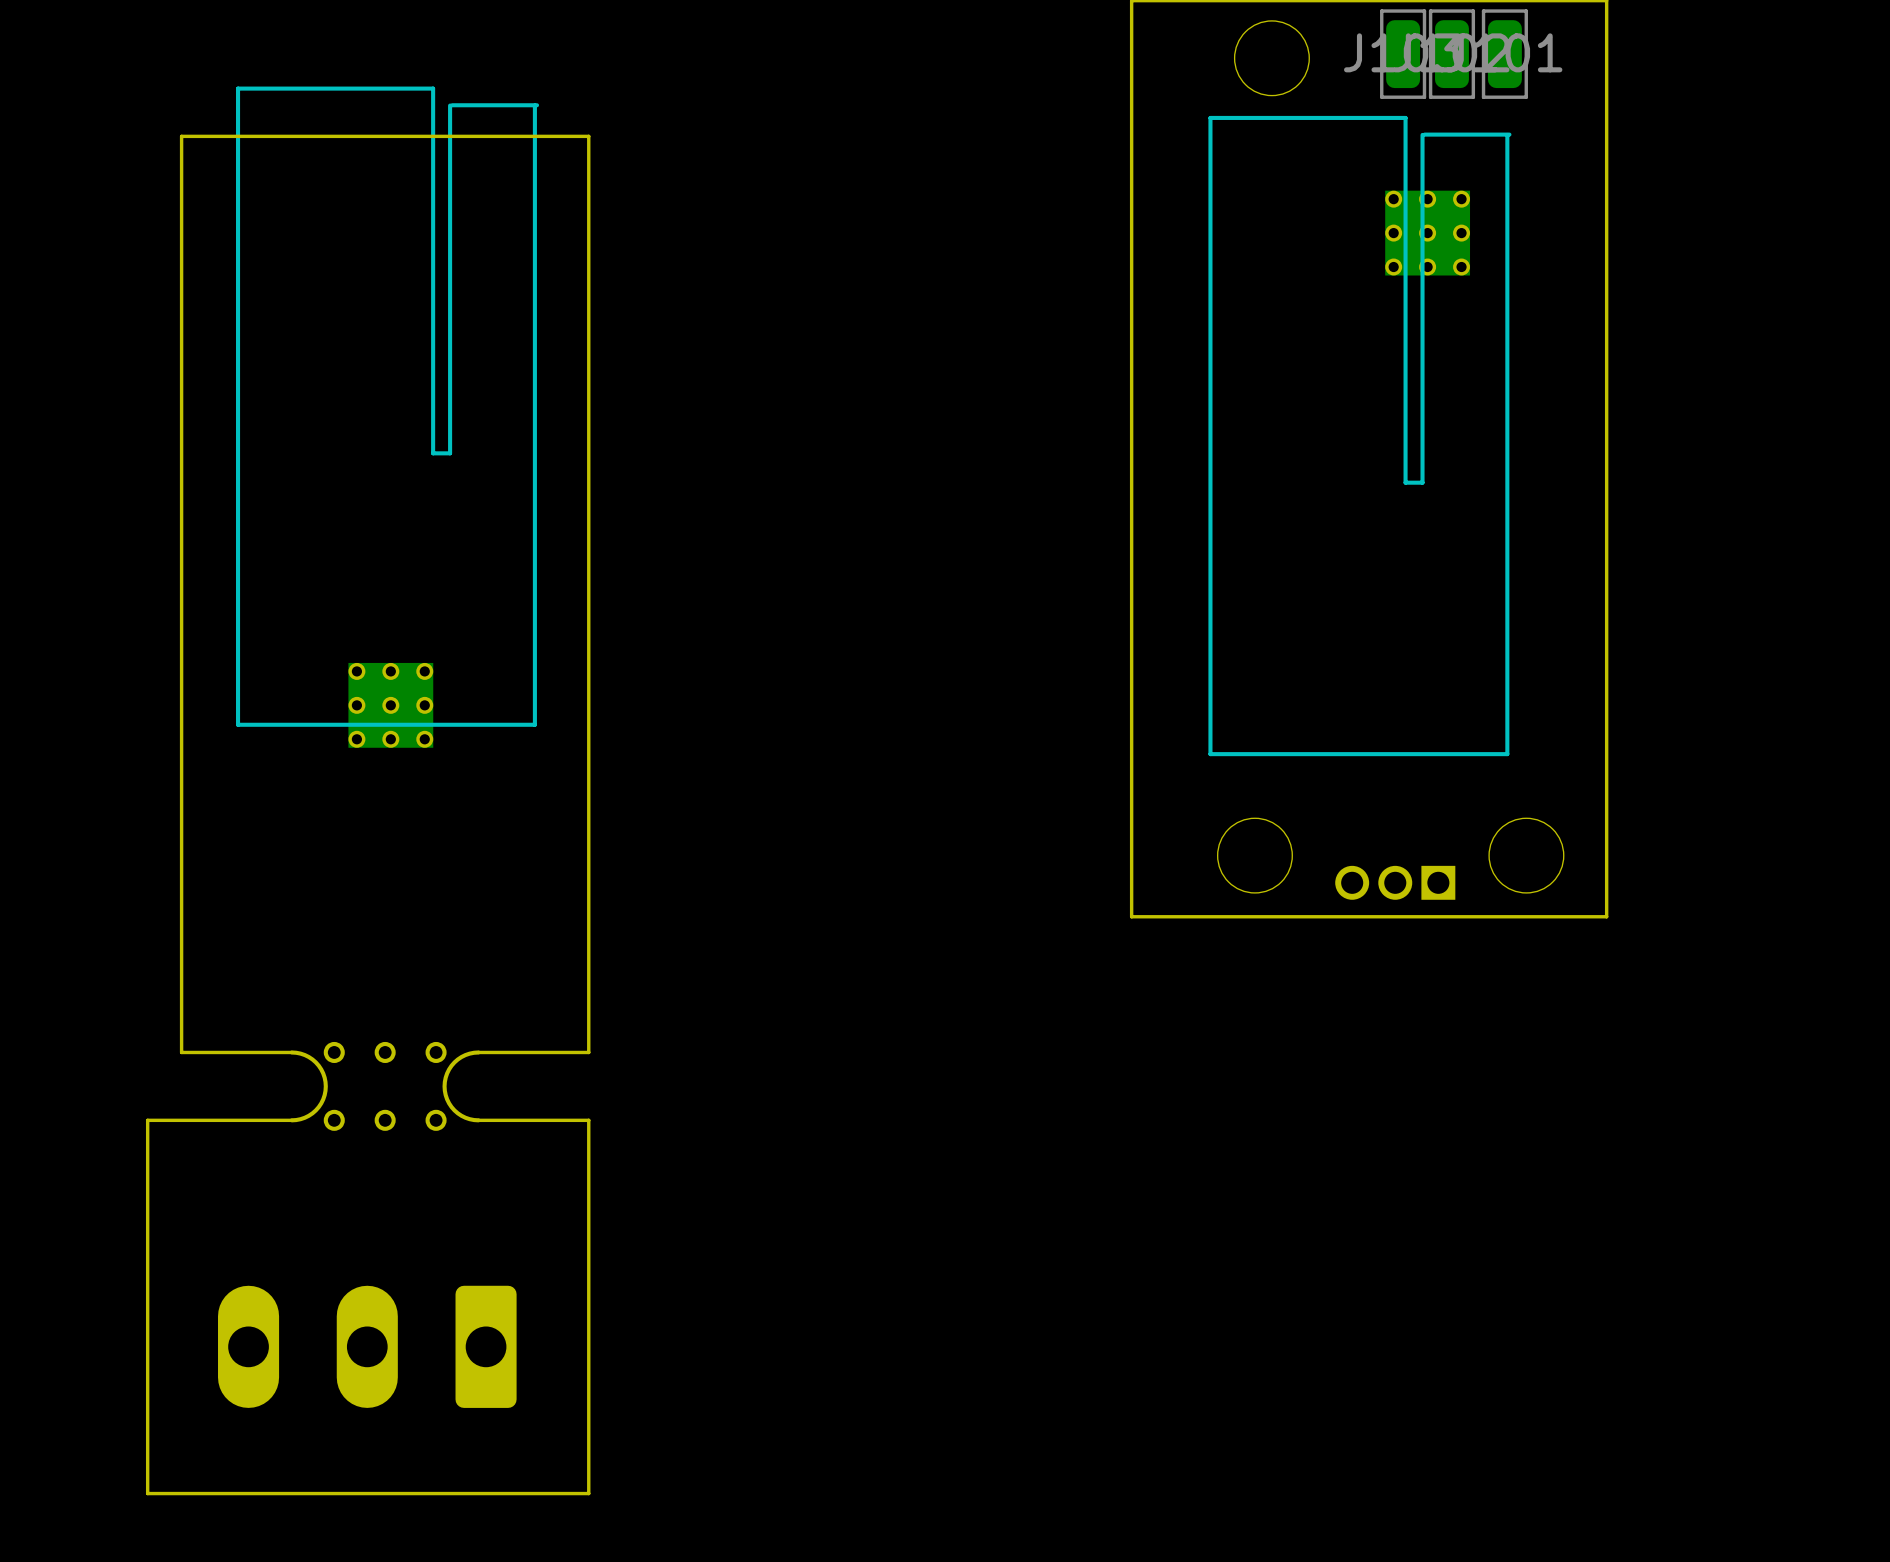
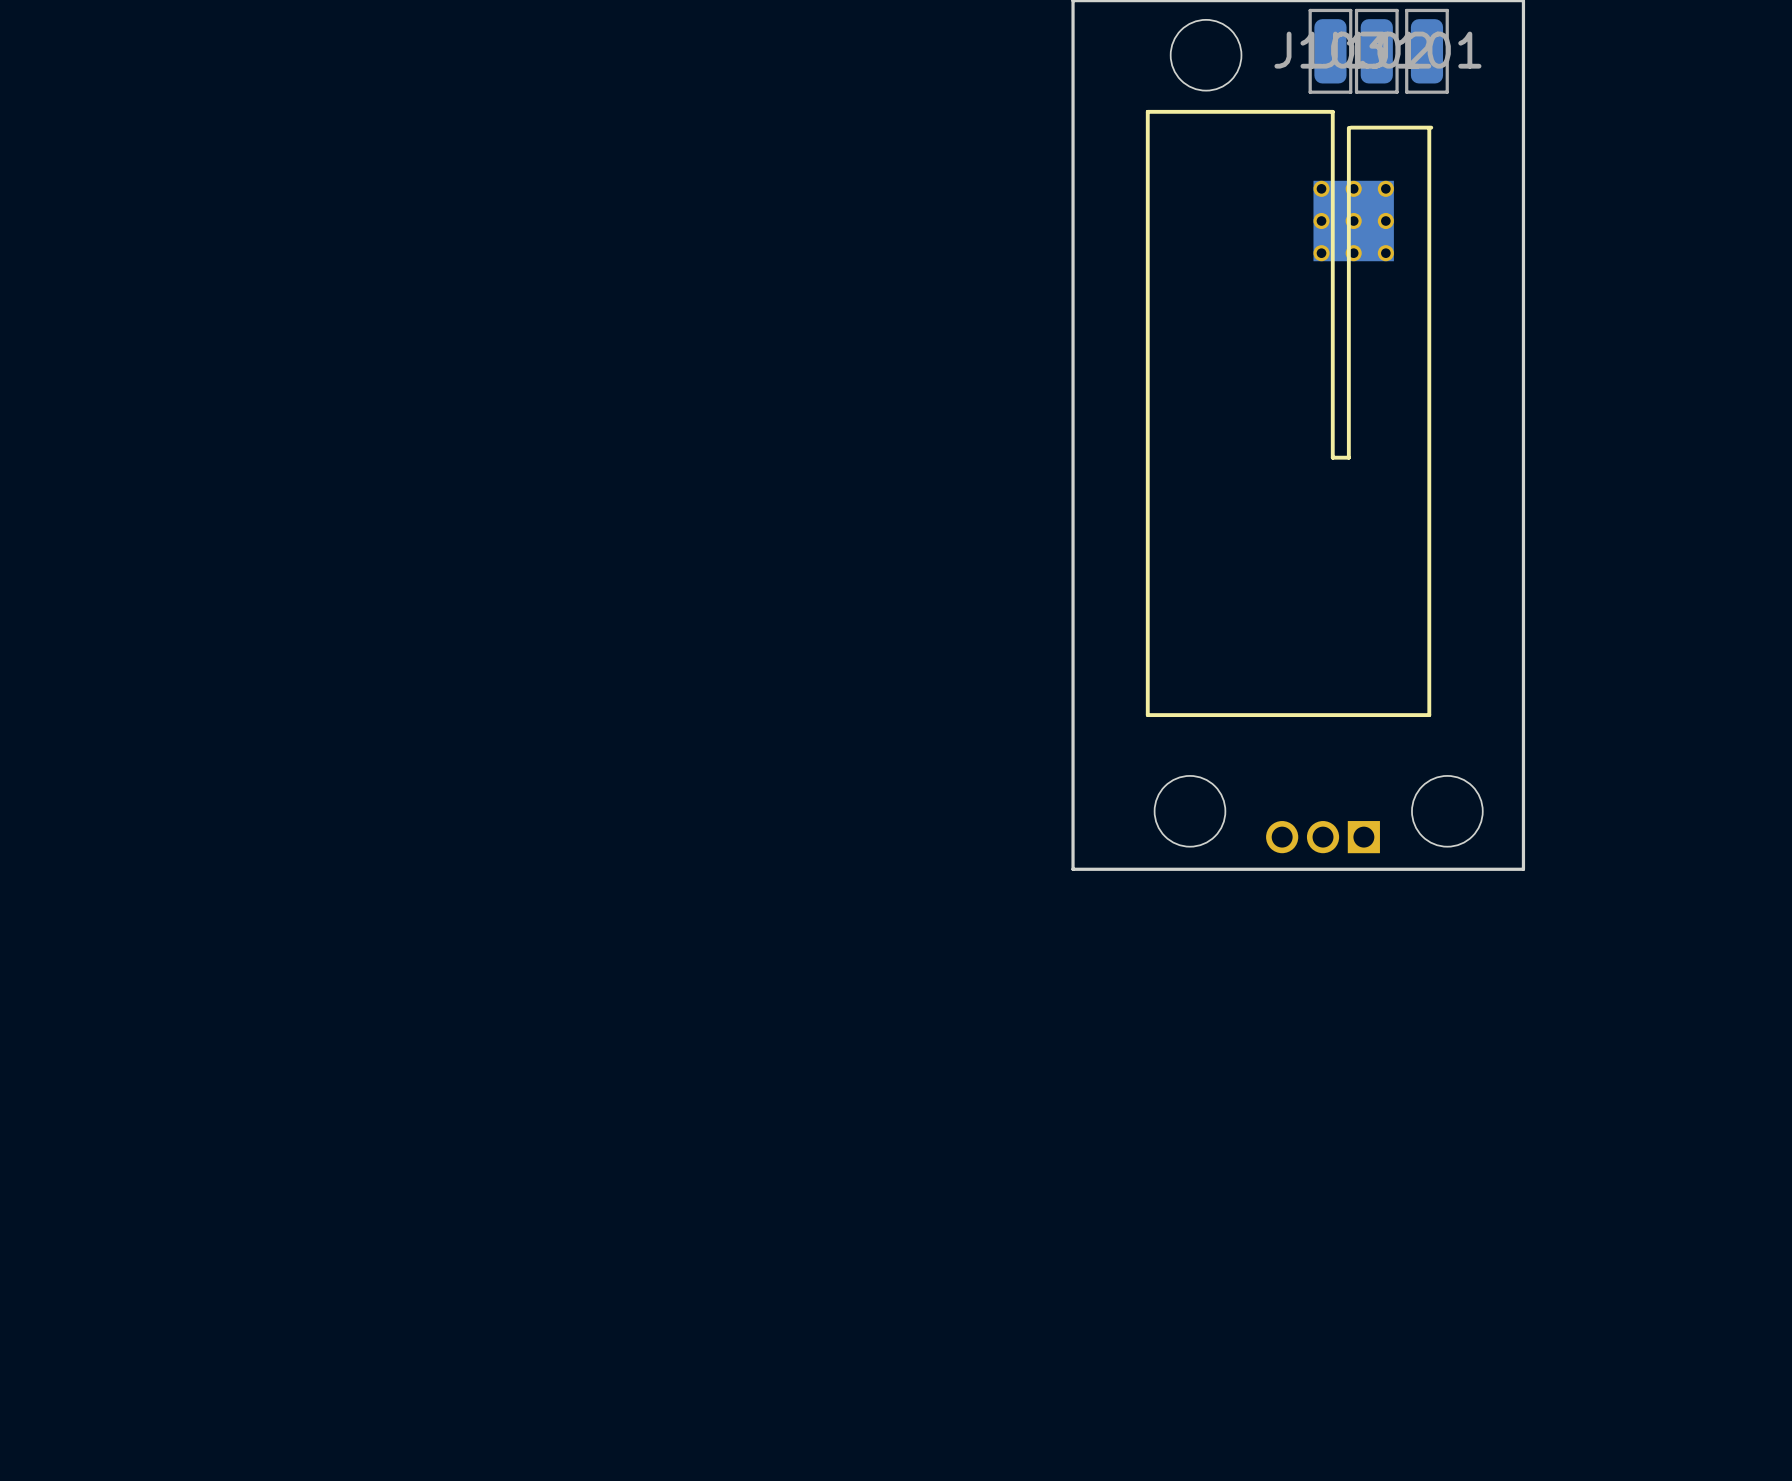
line: (534, 105) (534, 724) (238, 724) (238, 88) (433, 88) (433, 453) (450, 453) (450, 105) -> none
line: (537, 105) (452, 105) -> none
part: (390, 705) -> none
drawing: [289, 1041, 481, 1131] -> none
board edge: (478, 1052) (588, 1052) (588, 136) (181, 136) (181, 1052) (291, 1052) -> none
board edge: (478, 1120) (588, 1120) (588, 1493) (147, 1493) (147, 1120) (291, 1120) -> none
part: (367, 1346) -> none

